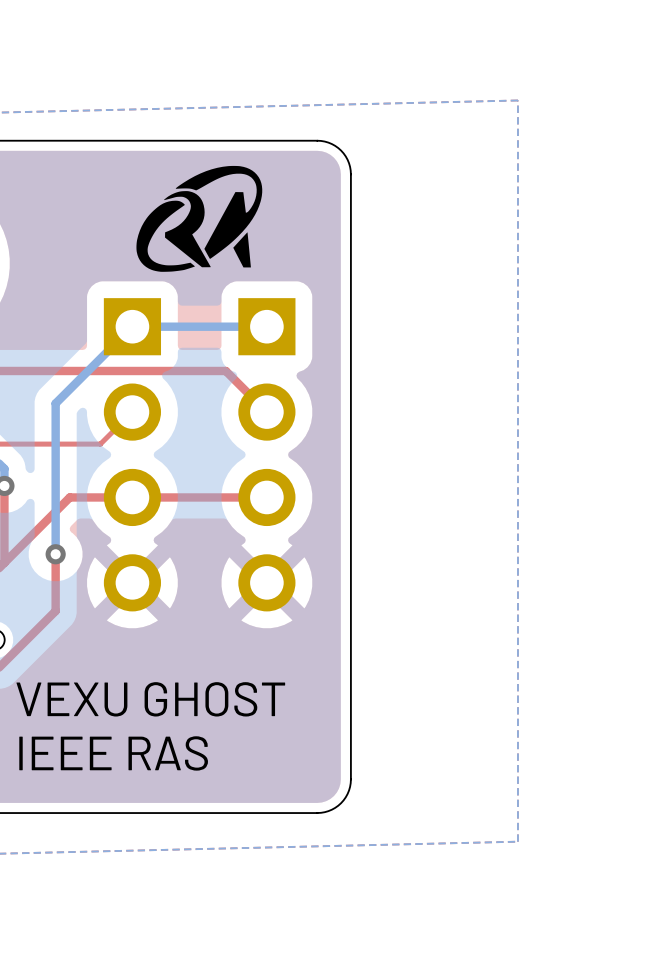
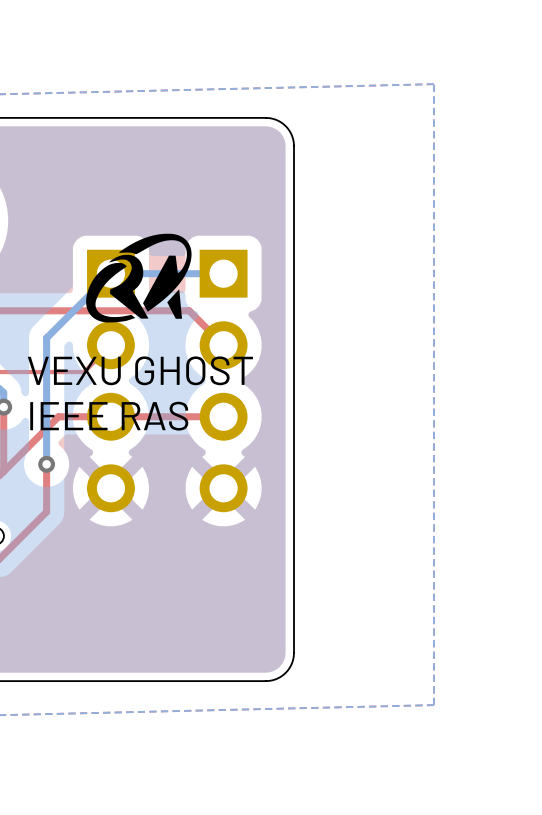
drawing position: (199, 218) -> (138, 278)
text position: VEXU GHOST (150, 699) -> VEXU GHOST (140, 370)
text position: IEEE RAS (113, 753) -> IEEE RAS (109, 416)

